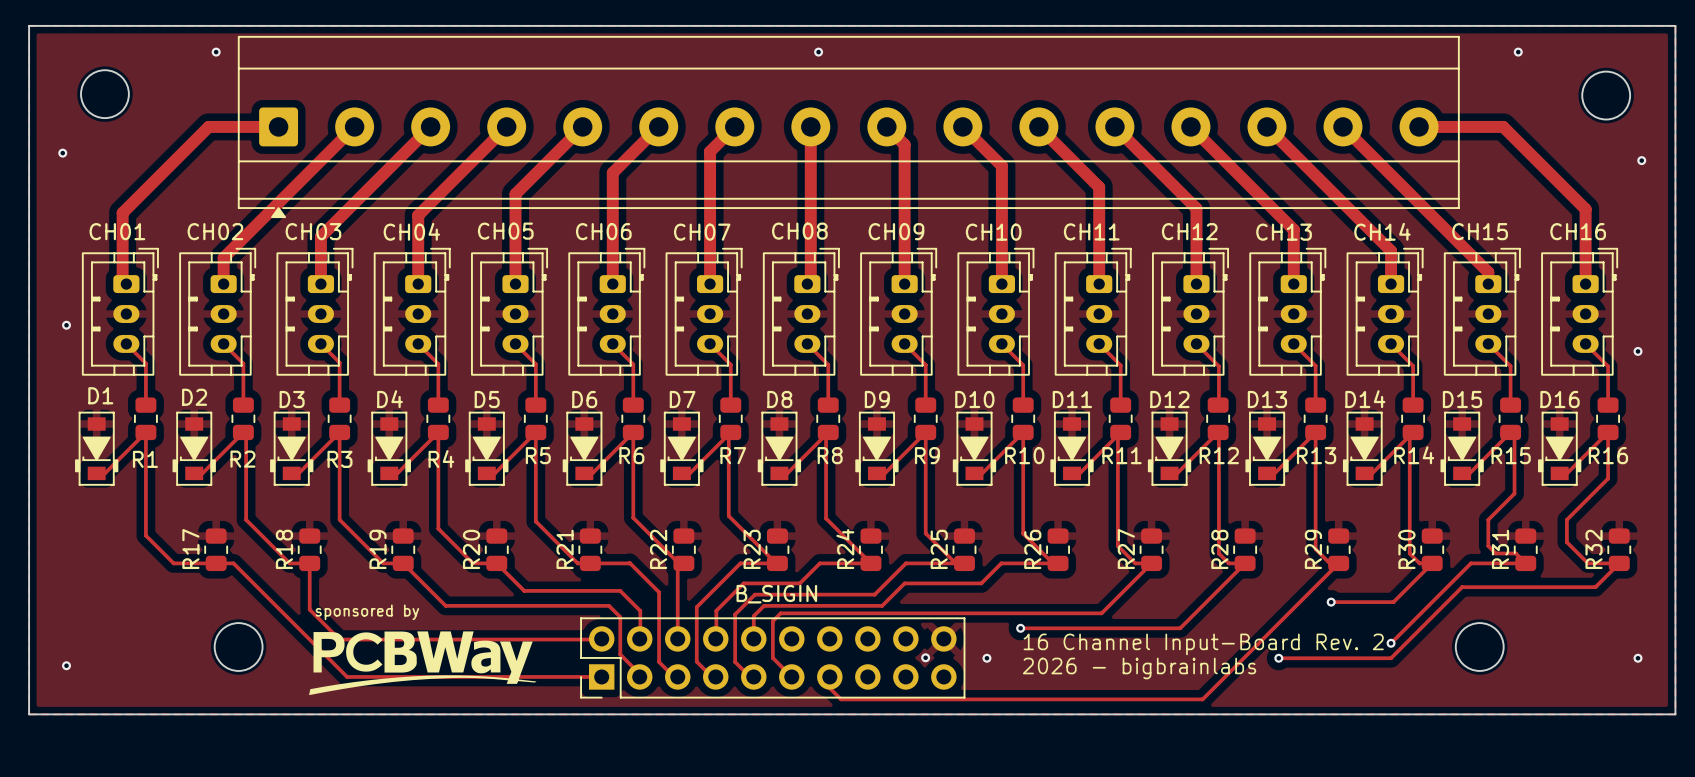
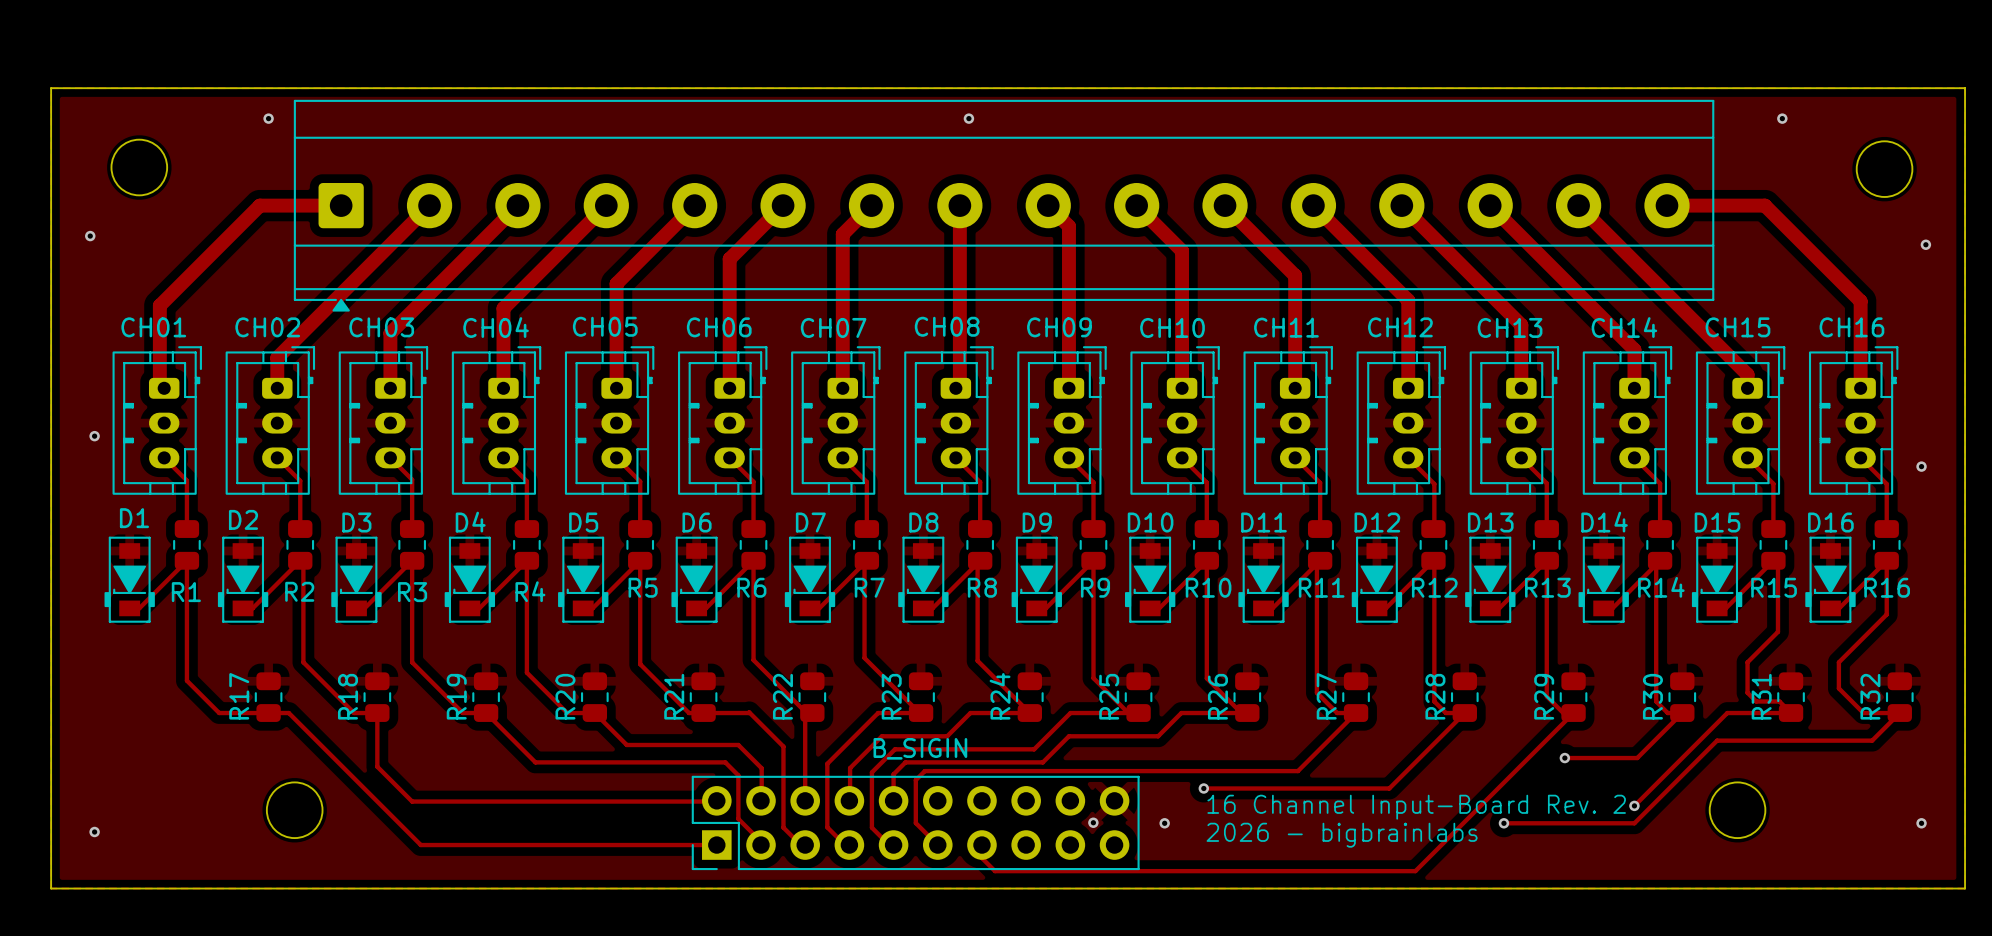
text: sponsored by (367, 612) -> none
drawing: [309, 631, 537, 696] -> none

